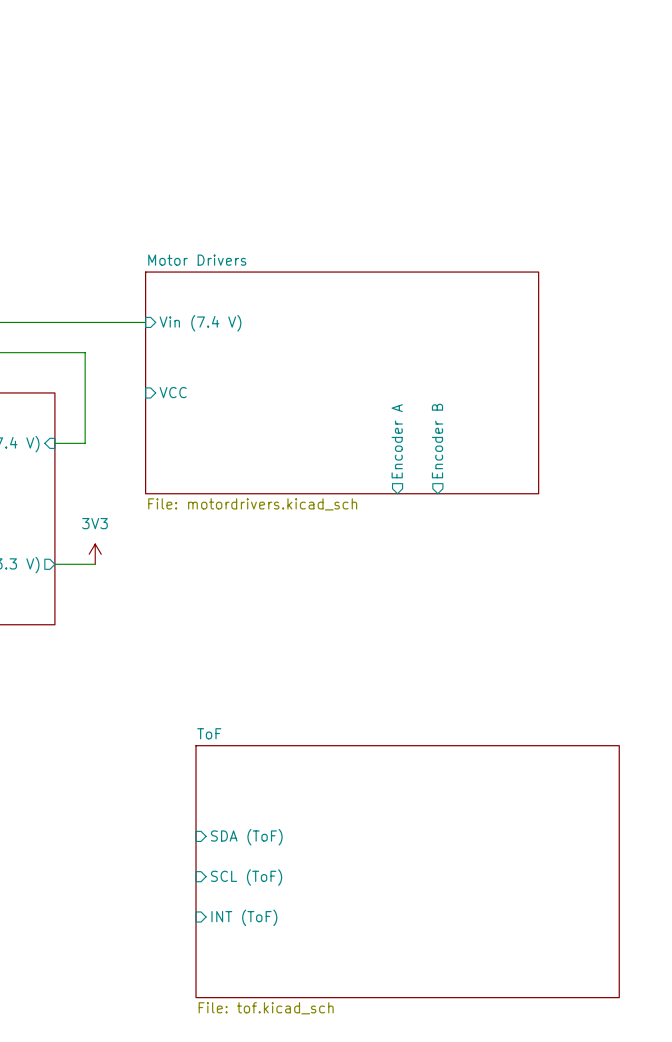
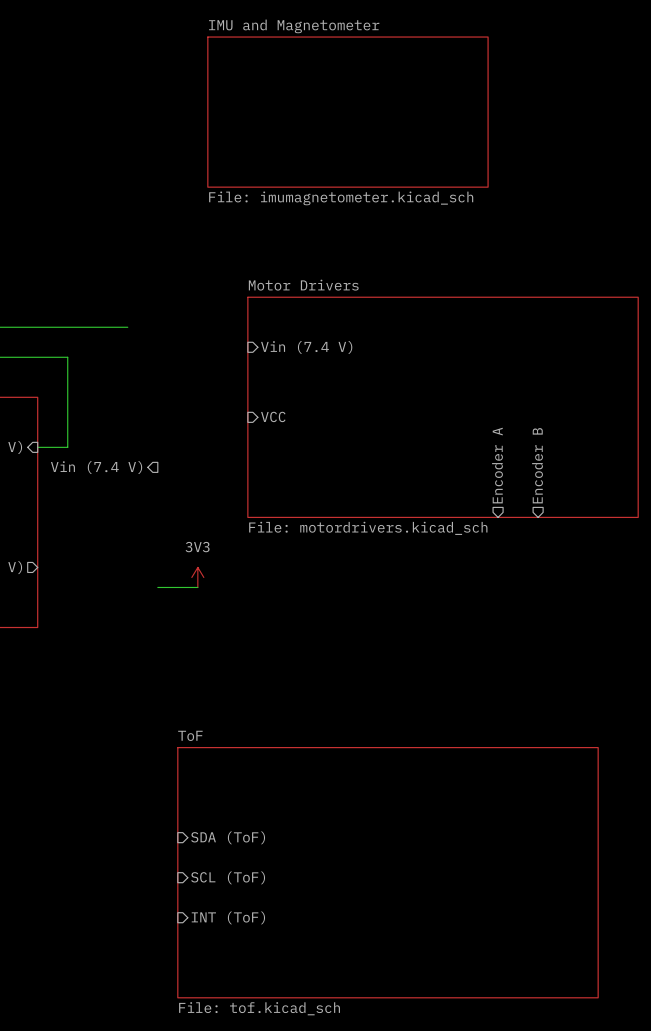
sheet IMU and Magnetometer: none -> File: imumagnetometer.kicad_sch (347, 112)
sheet pin: Vin (7.4 V) (200, 323) -> none
sheet pin: none -> Vin (7.4 V) (306, 347)
sheet Motor Drivers position: (342, 382) -> (443, 407)
sheet pin position: VCC (173, 392) -> VCC (273, 416)
sheet pin position: Encoder A (397, 441) -> Encoder A (497, 465)
sheet pin position: Encoder B (437, 441) -> Encoder B (537, 465)
sheet pin: none -> Vin (7.4 V) (96, 467)
power symbol position: 3V3 (95, 554) -> 3V3 (197, 577)
wire: (54, 564) (95, 564) -> (157, 587) (197, 587)

